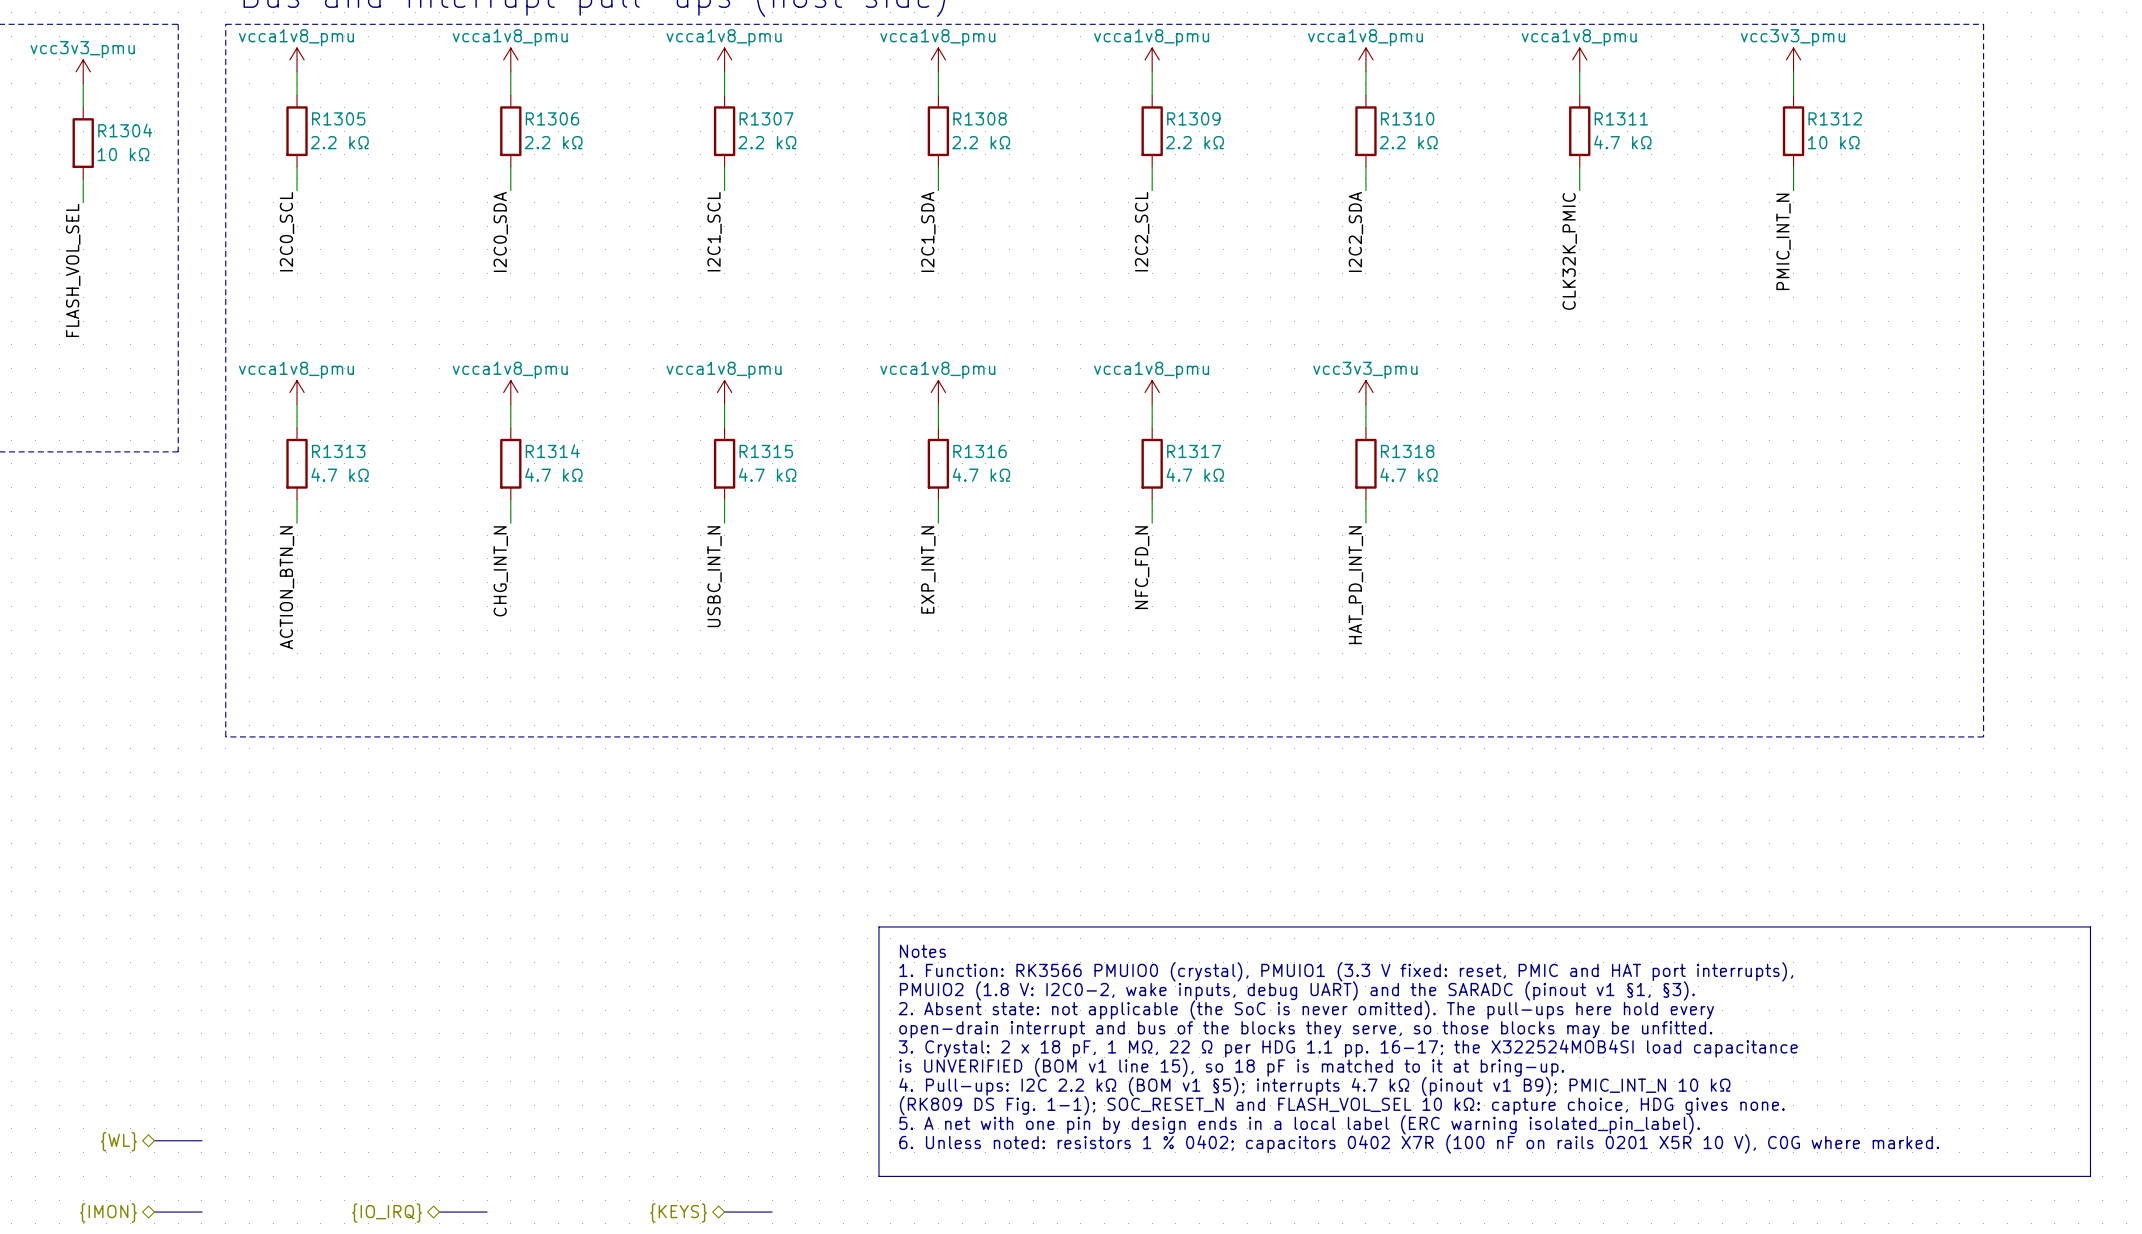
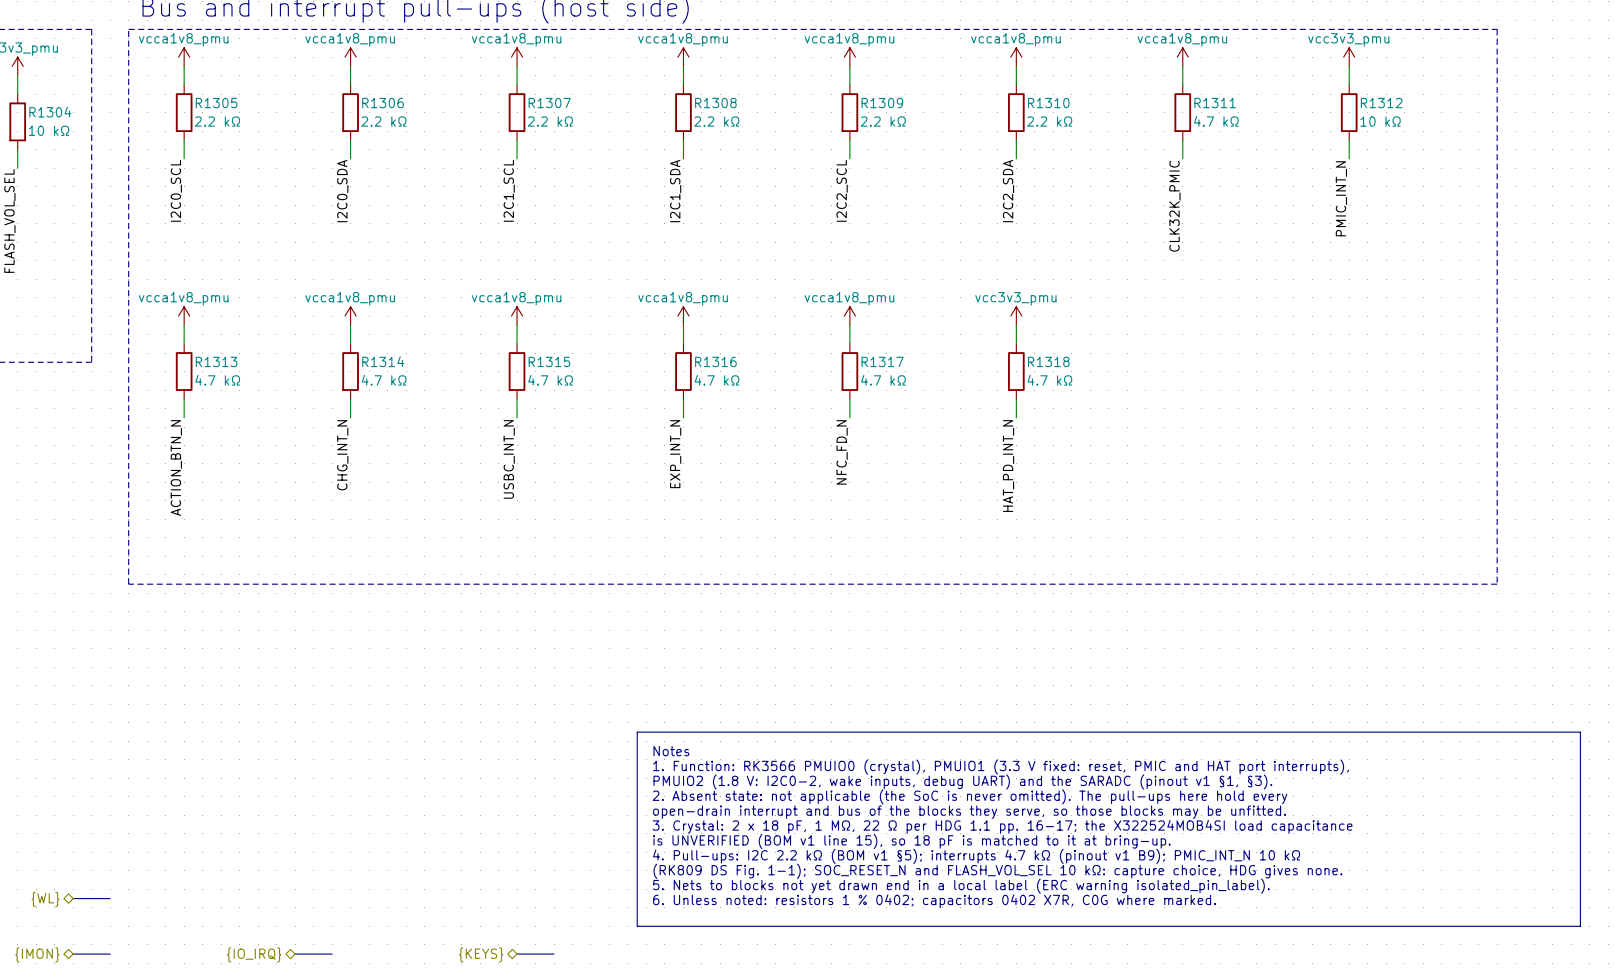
text: 5. A net with one pin by design ends in a local label (ERC warning isolated_pin_label). (1299, 1124) -> 5. Nets to blocks not yet drawn end in a local label (ERC warning isolated_pin_label). (961, 886)
text: 6. Unless noted: resistors 1 % 0402; capacitors 0402 X7R (100 nF on rails 0201 X5R 10 V), C0G where marked. (1419, 1143) -> 6. Unless noted: resistors 1 % 0402; capacitors 0402 X7R, C0G where marked. (934, 901)

